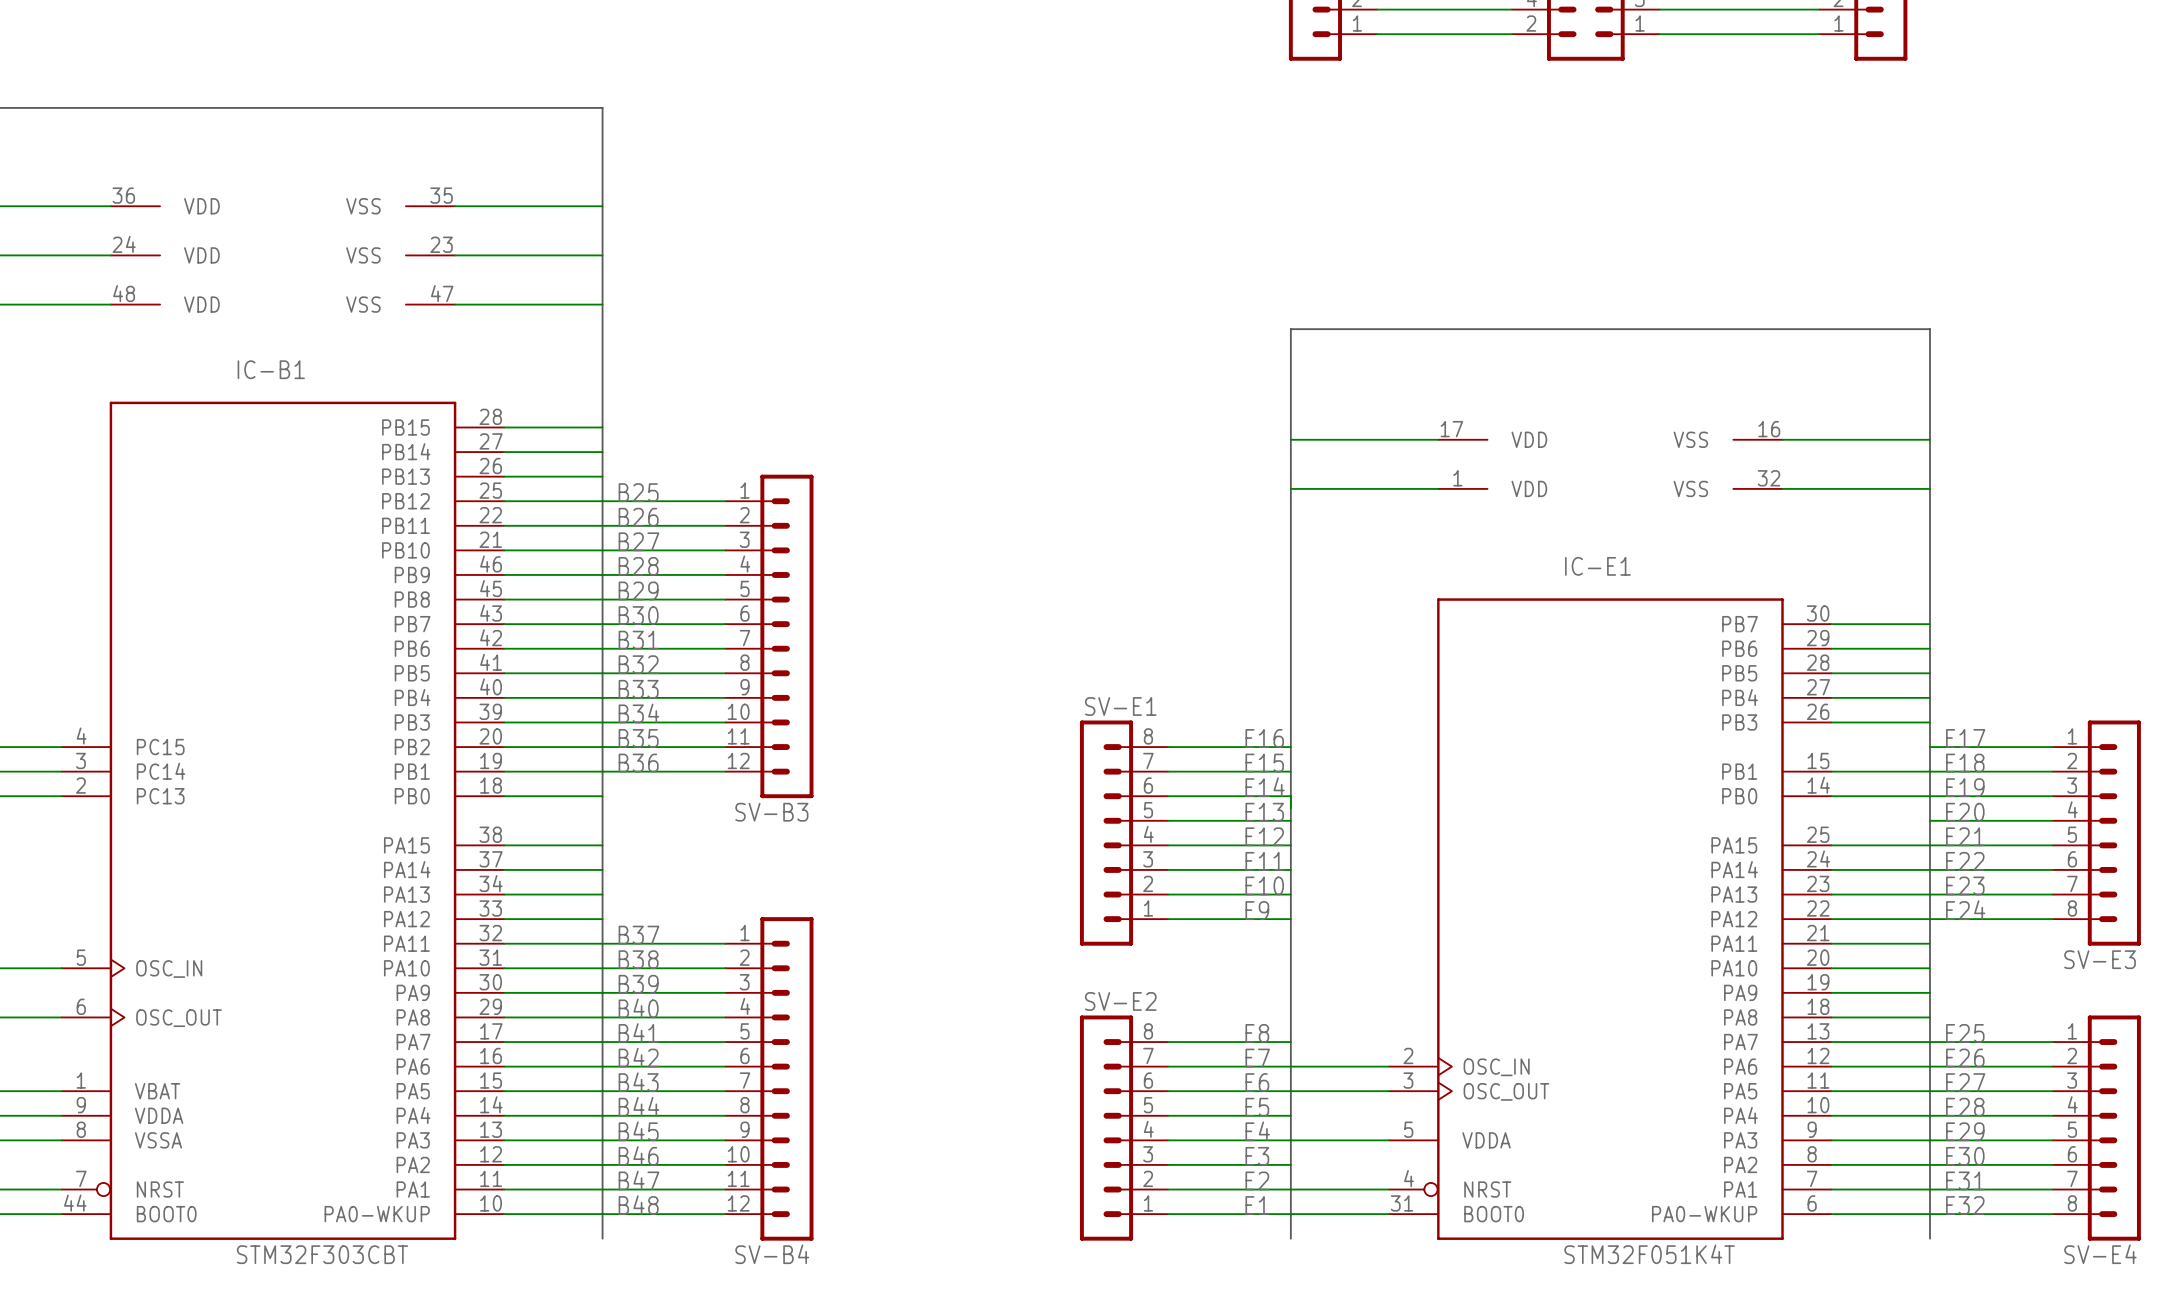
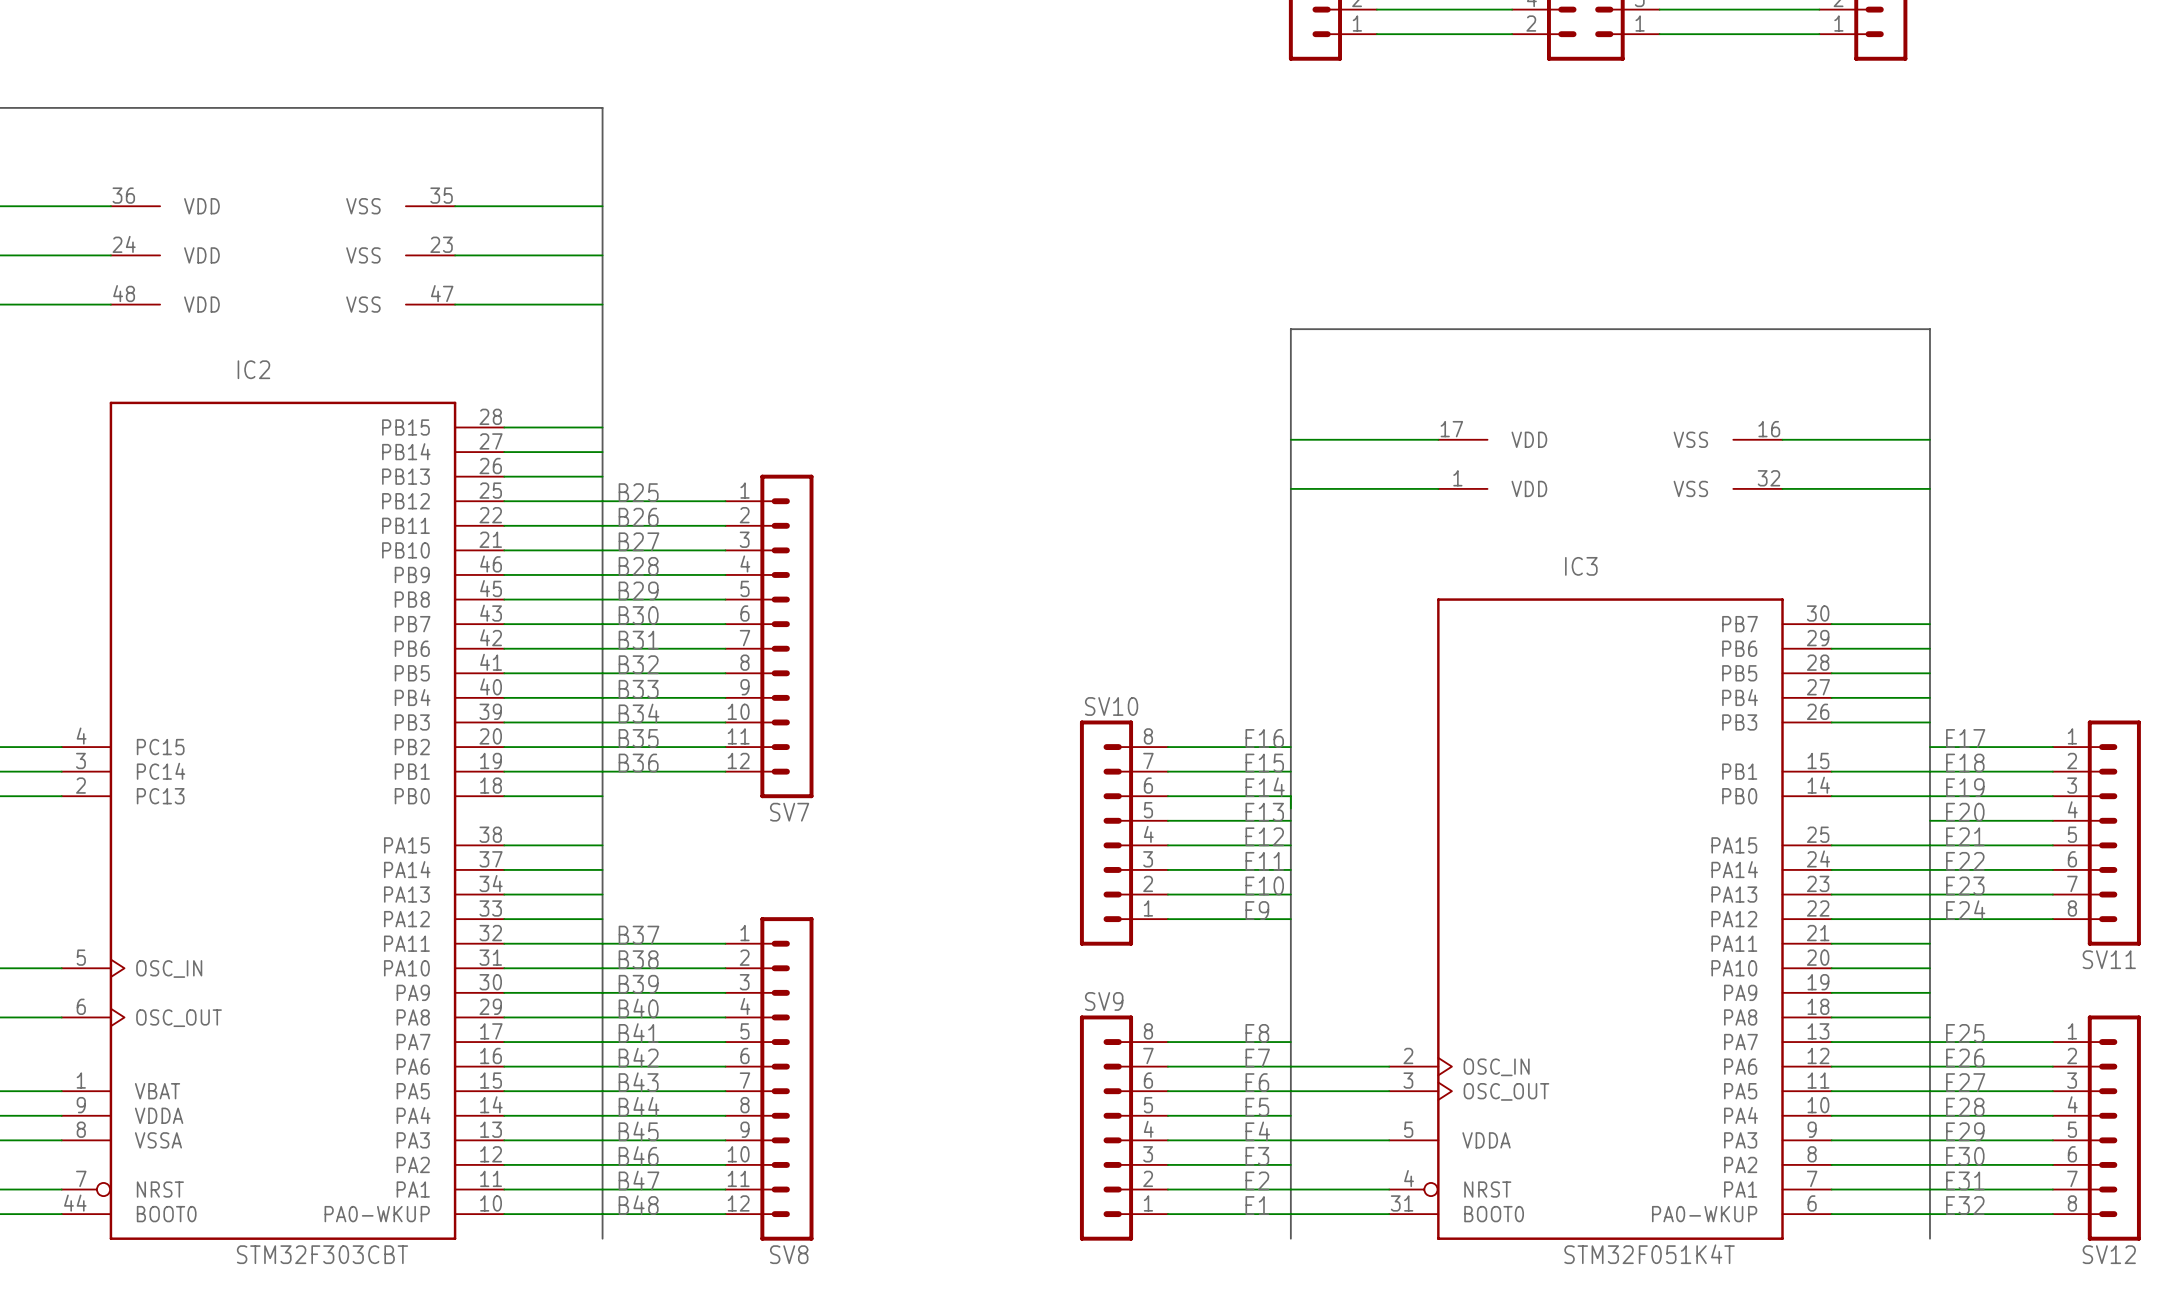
IC-B1 name: IC-B1 (271, 369) -> IC2 (253, 369)
IC-E1 name: IC-E1 (1597, 566) -> IC3 (1581, 566)
SV-E1 name: SV-E1 (1120, 706) -> SV10 (1111, 706)
SV-B3 name: SV-B3 (771, 812) -> SV7 (789, 812)
SV-E3 name: SV-E3 (2100, 959) -> SV11 (2109, 959)
SV-E2 name: SV-E2 (1120, 1001) -> SV9 (1104, 1001)
SV-B4 name: SV-B4 (772, 1254) -> SV8 (789, 1254)
SV-E4 name: SV-E4 (2100, 1254) -> SV12 (2109, 1254)

